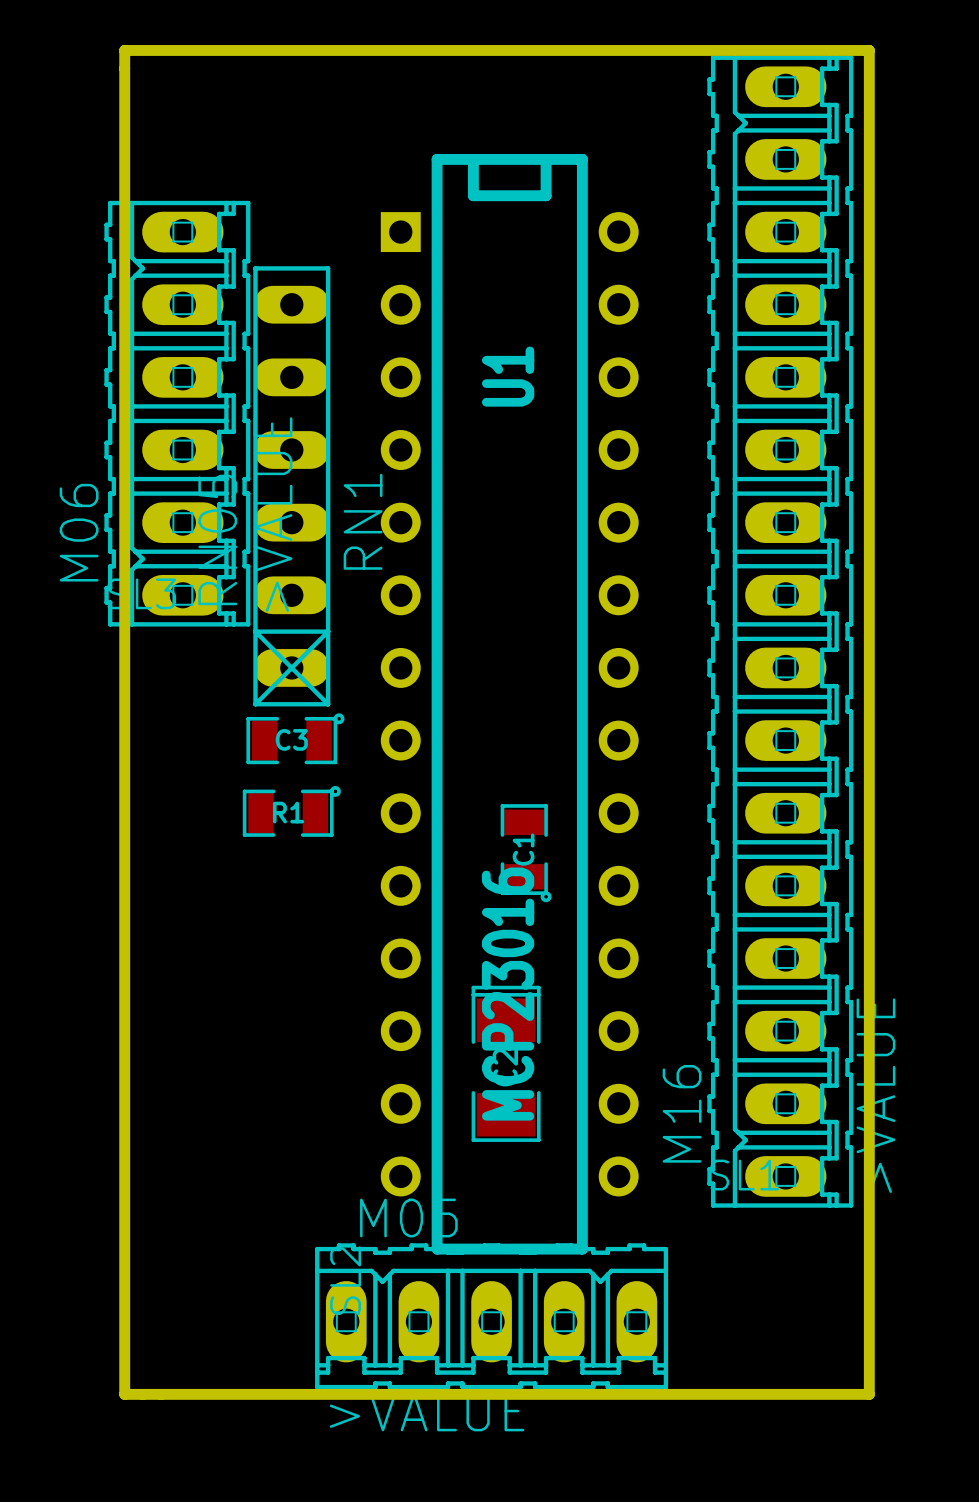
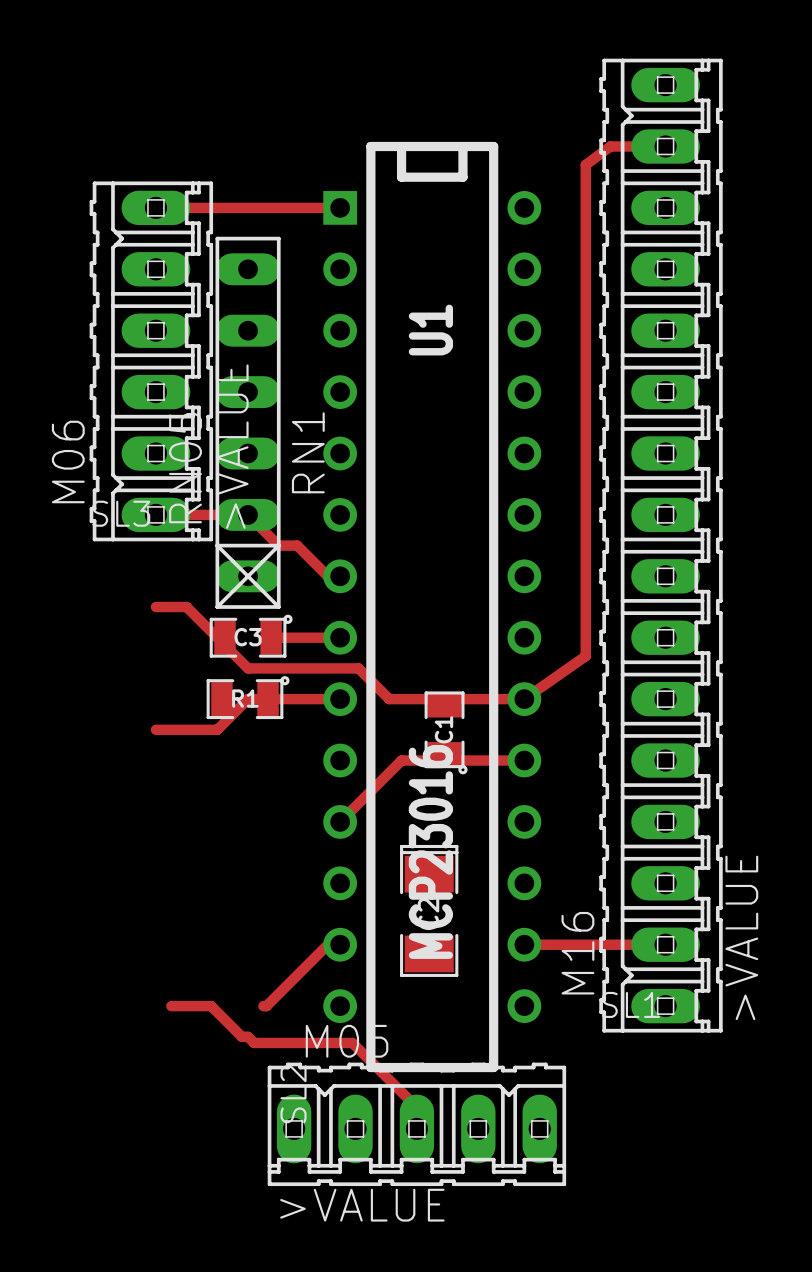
board edge: (124, 50) (869, 50) (869, 1394) (124, 1394) (124, 50) -> none
track: none -> (665, 146) (610, 146) (585, 164) (585, 656) (524, 699) (389, 699) (358, 668) (248, 668) (186, 607) (155, 607)
track: none -> (155, 207) (340, 207)
track: none -> (155, 514) (248, 514) (278, 545) (297, 545) (327, 576) (340, 576)
track: none -> (278, 637) (340, 637)
track: none -> (340, 699) (248, 699) (217, 729) (155, 729)
track: none -> (524, 760) (401, 760) (340, 821)
track: none -> (340, 944) (327, 944) (266, 1006) (263, 1006)
track: none -> (524, 944) (665, 944)
track: none -> (171, 1006) (211, 1006) (241, 1036) (248, 1036) (254, 1042) (352, 1042) (419, 1110) (419, 1128) (416, 1128)

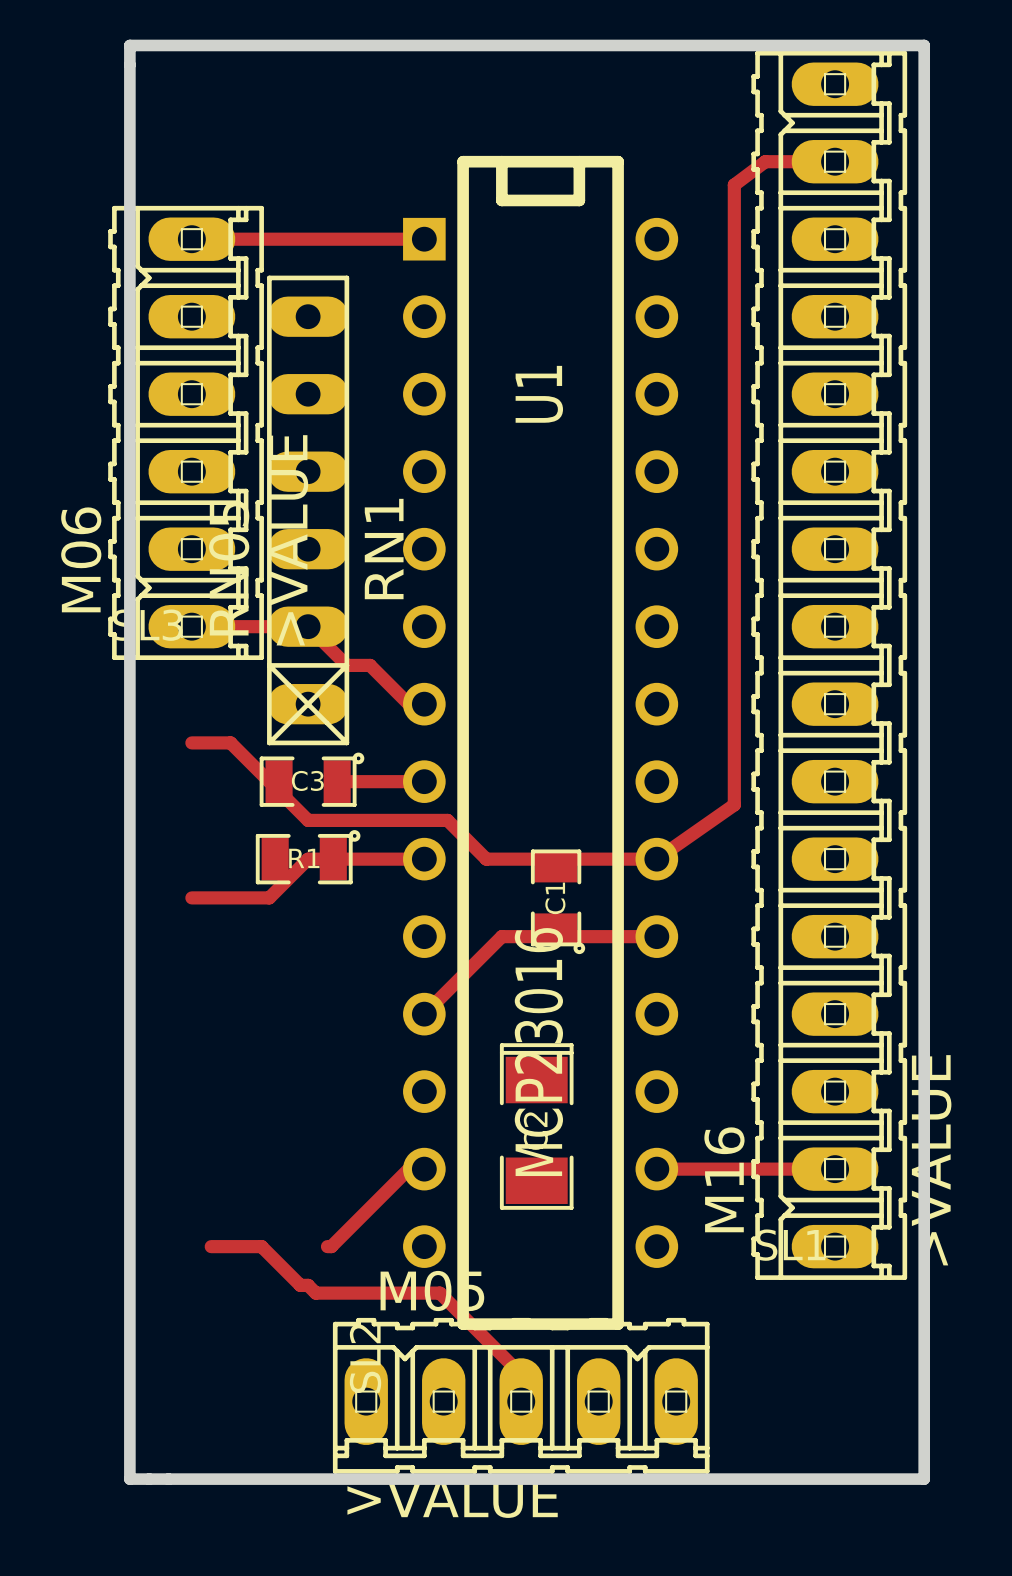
board edge: none -> (129, 45) (924, 45) (924, 1479) (129, 1479) (129, 45)

